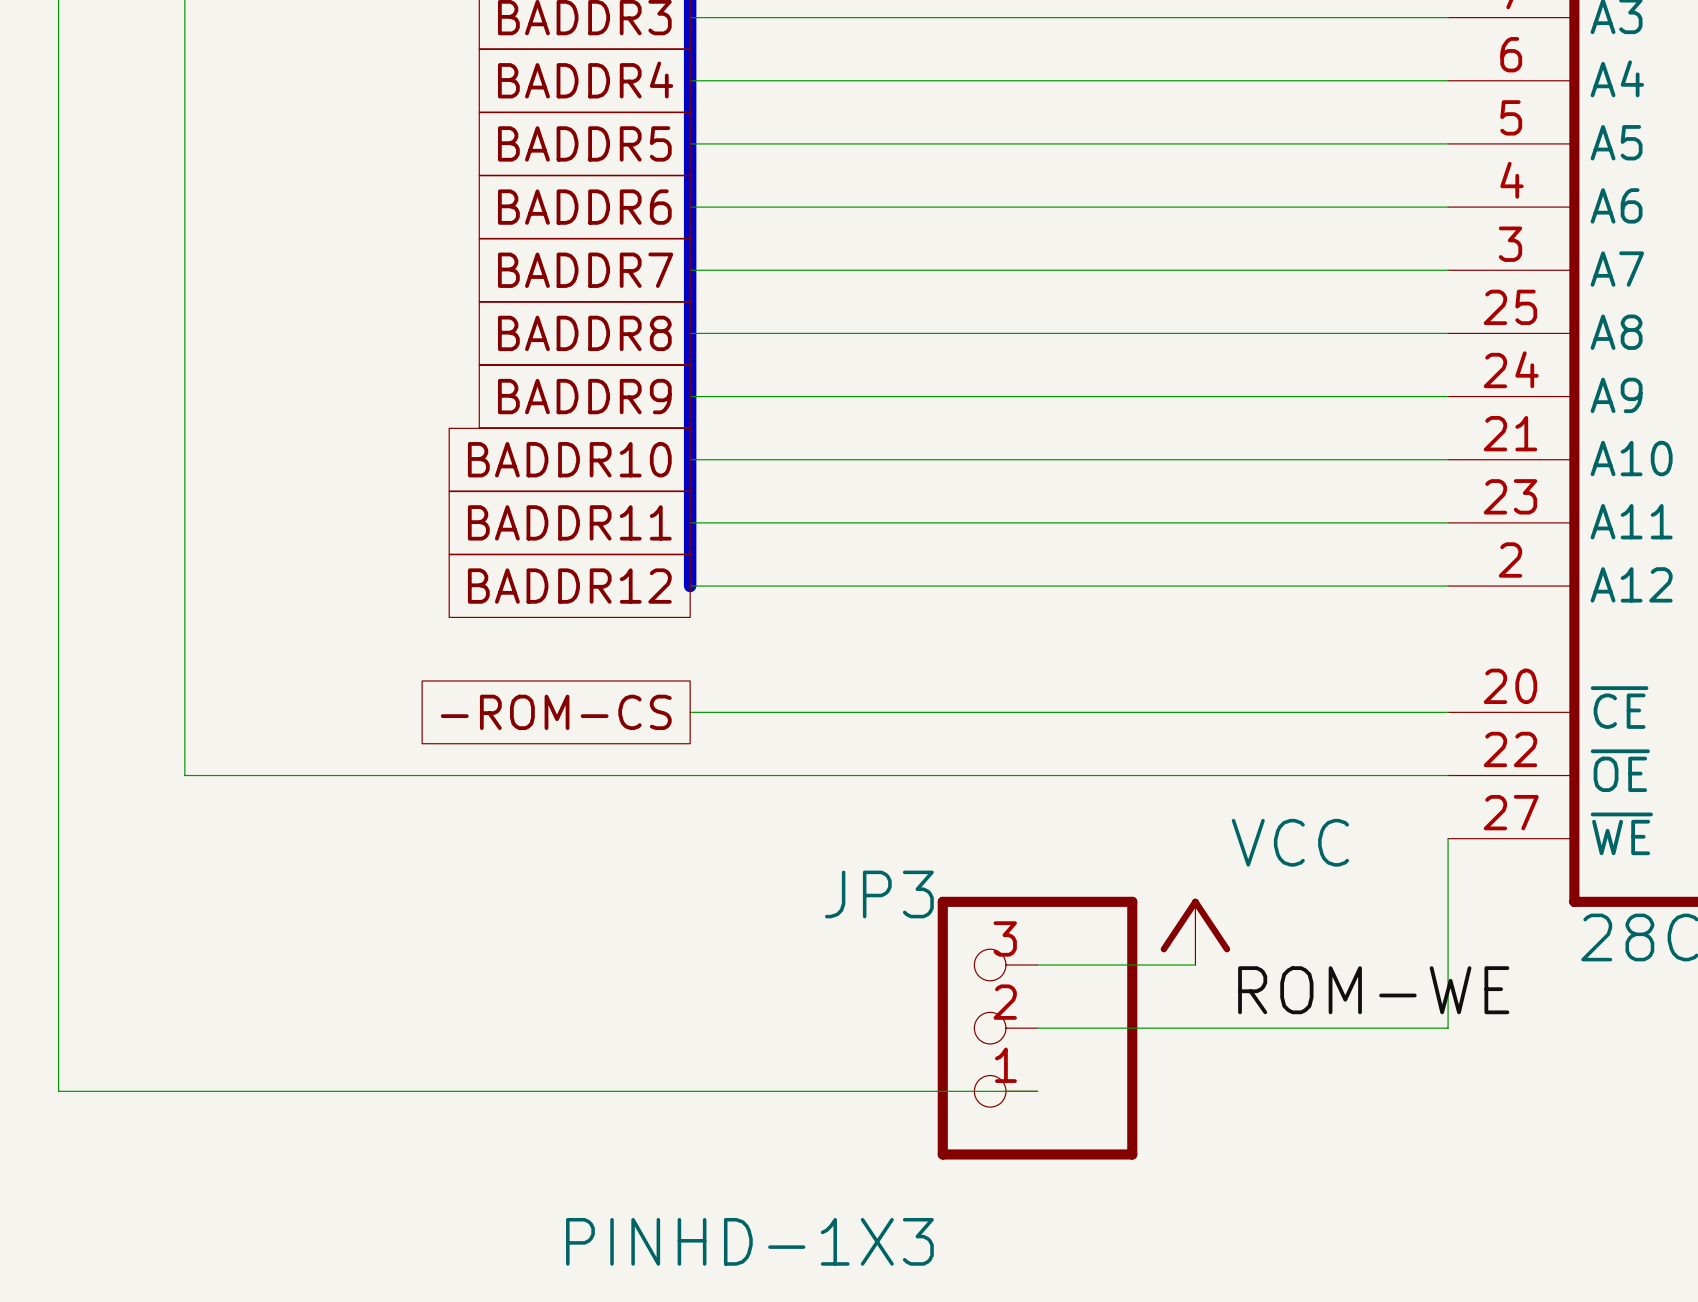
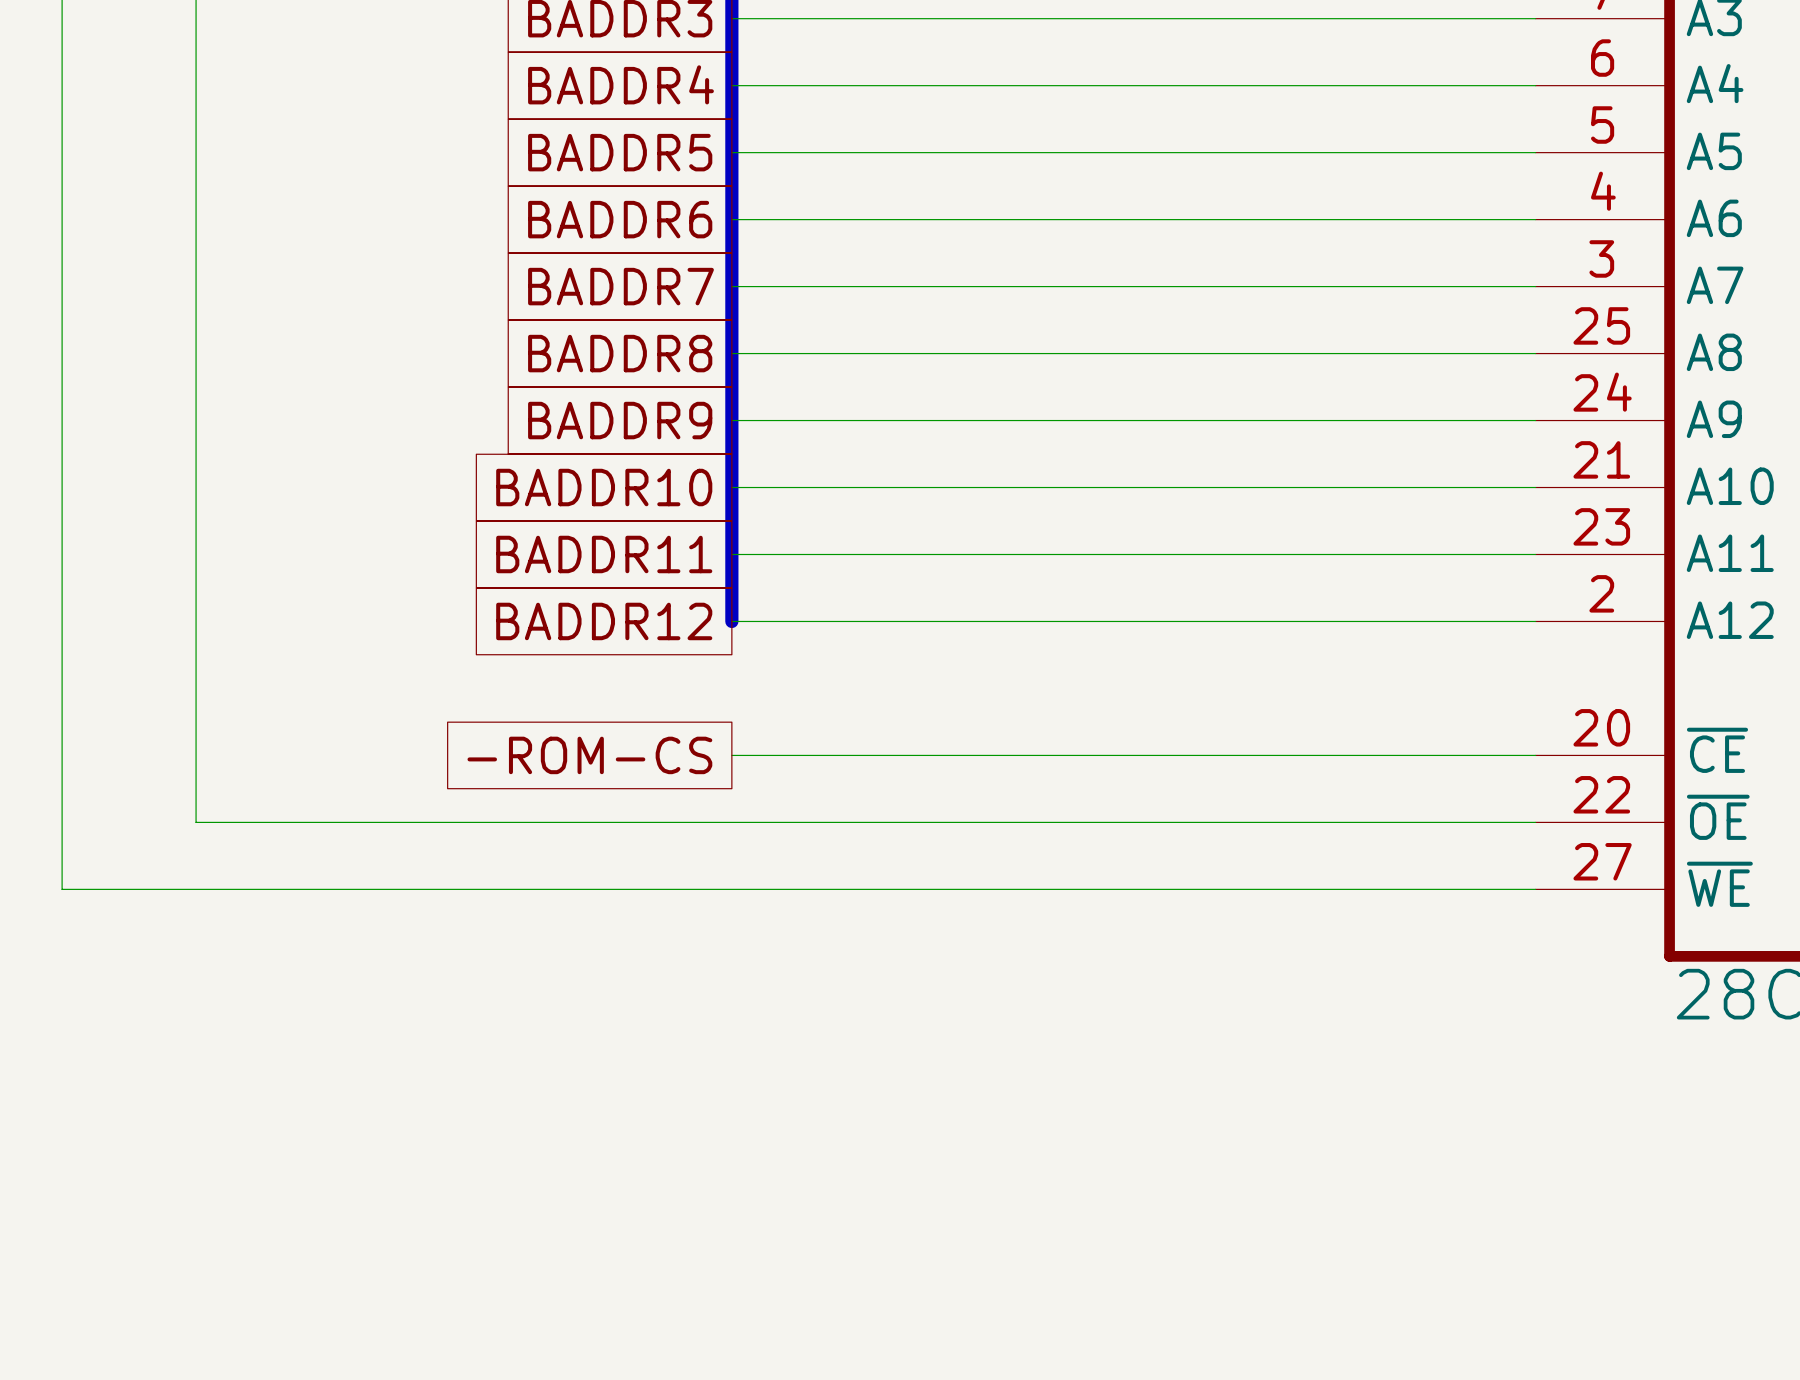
wire: (58, 838) (58, 1091) (1037, 1091) -> (62, 889) (1535, 889)
wire: (1448, 838) (1448, 1028) (1037, 1028) -> none
power symbol: VCC (1195, 931) -> none
wire: (1037, 965) (1195, 965) -> none
label: ROM-WE (1373, 990) -> none
JP3: PINHD-1X3 (1037, 1028) -> none

